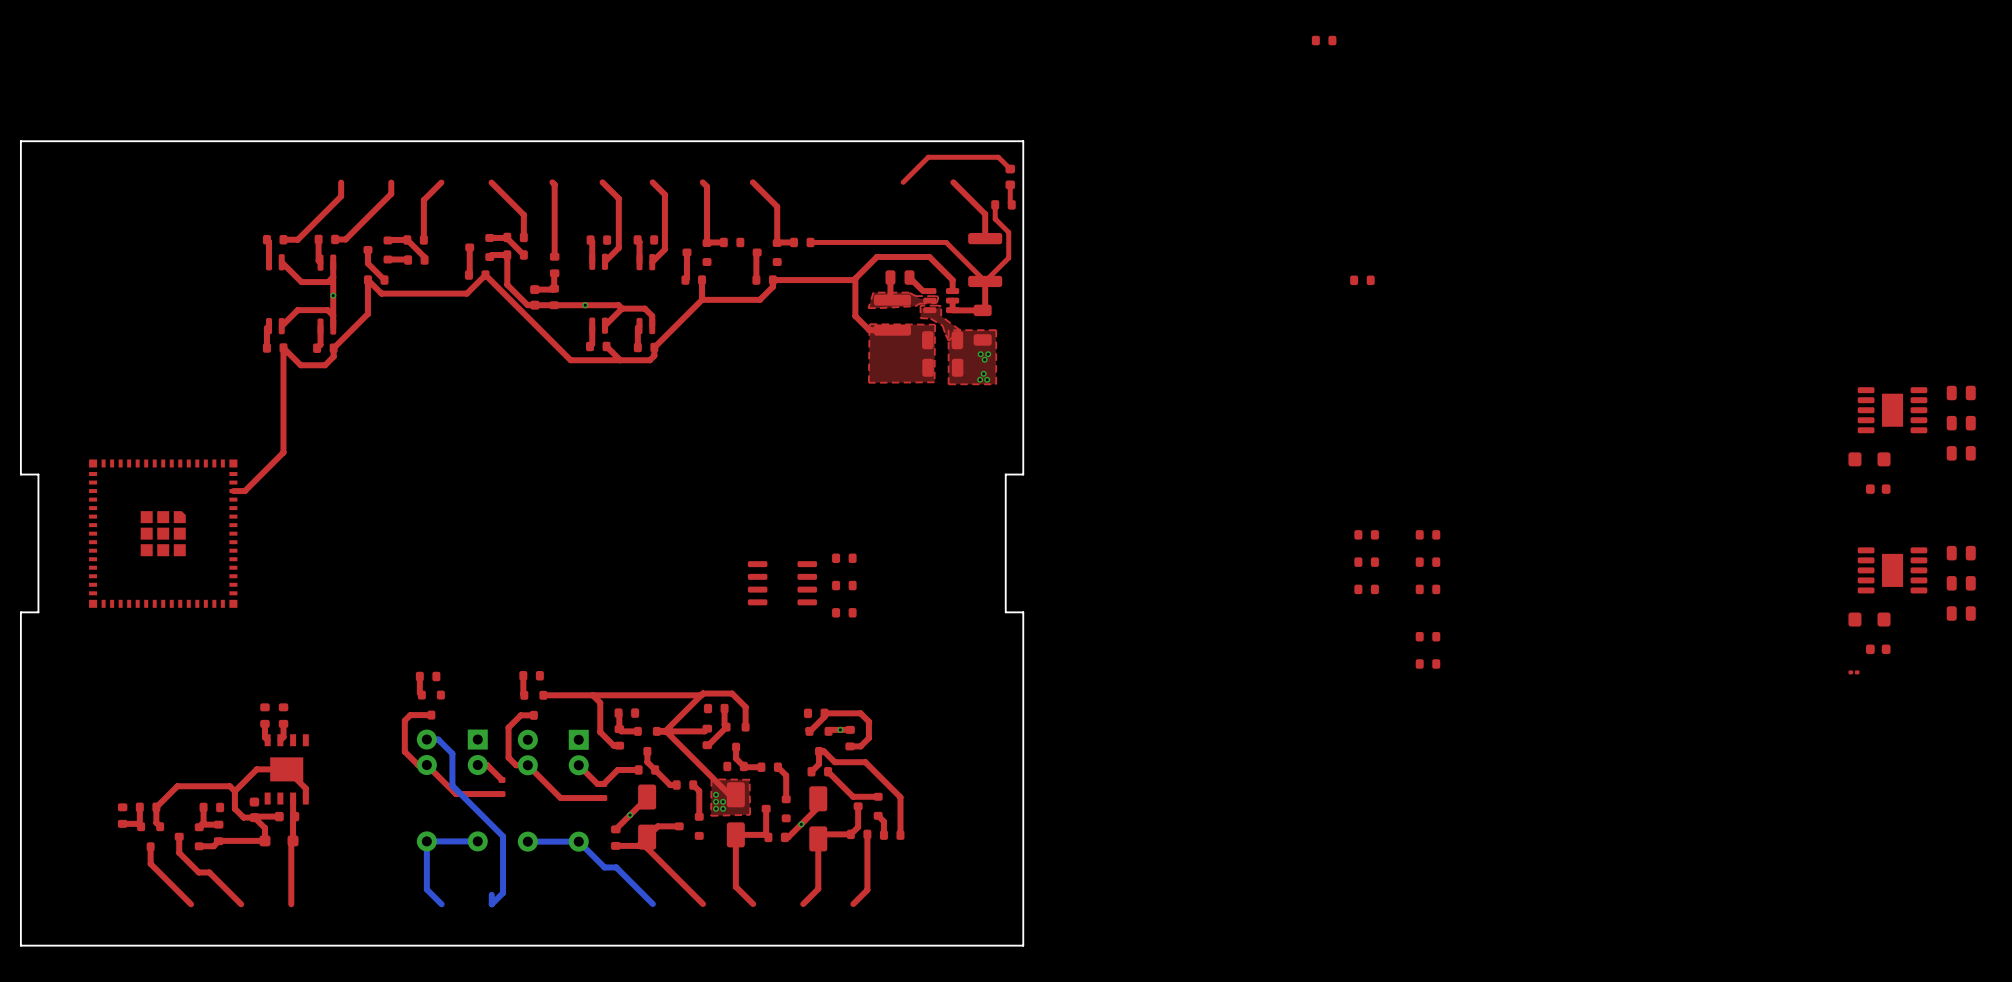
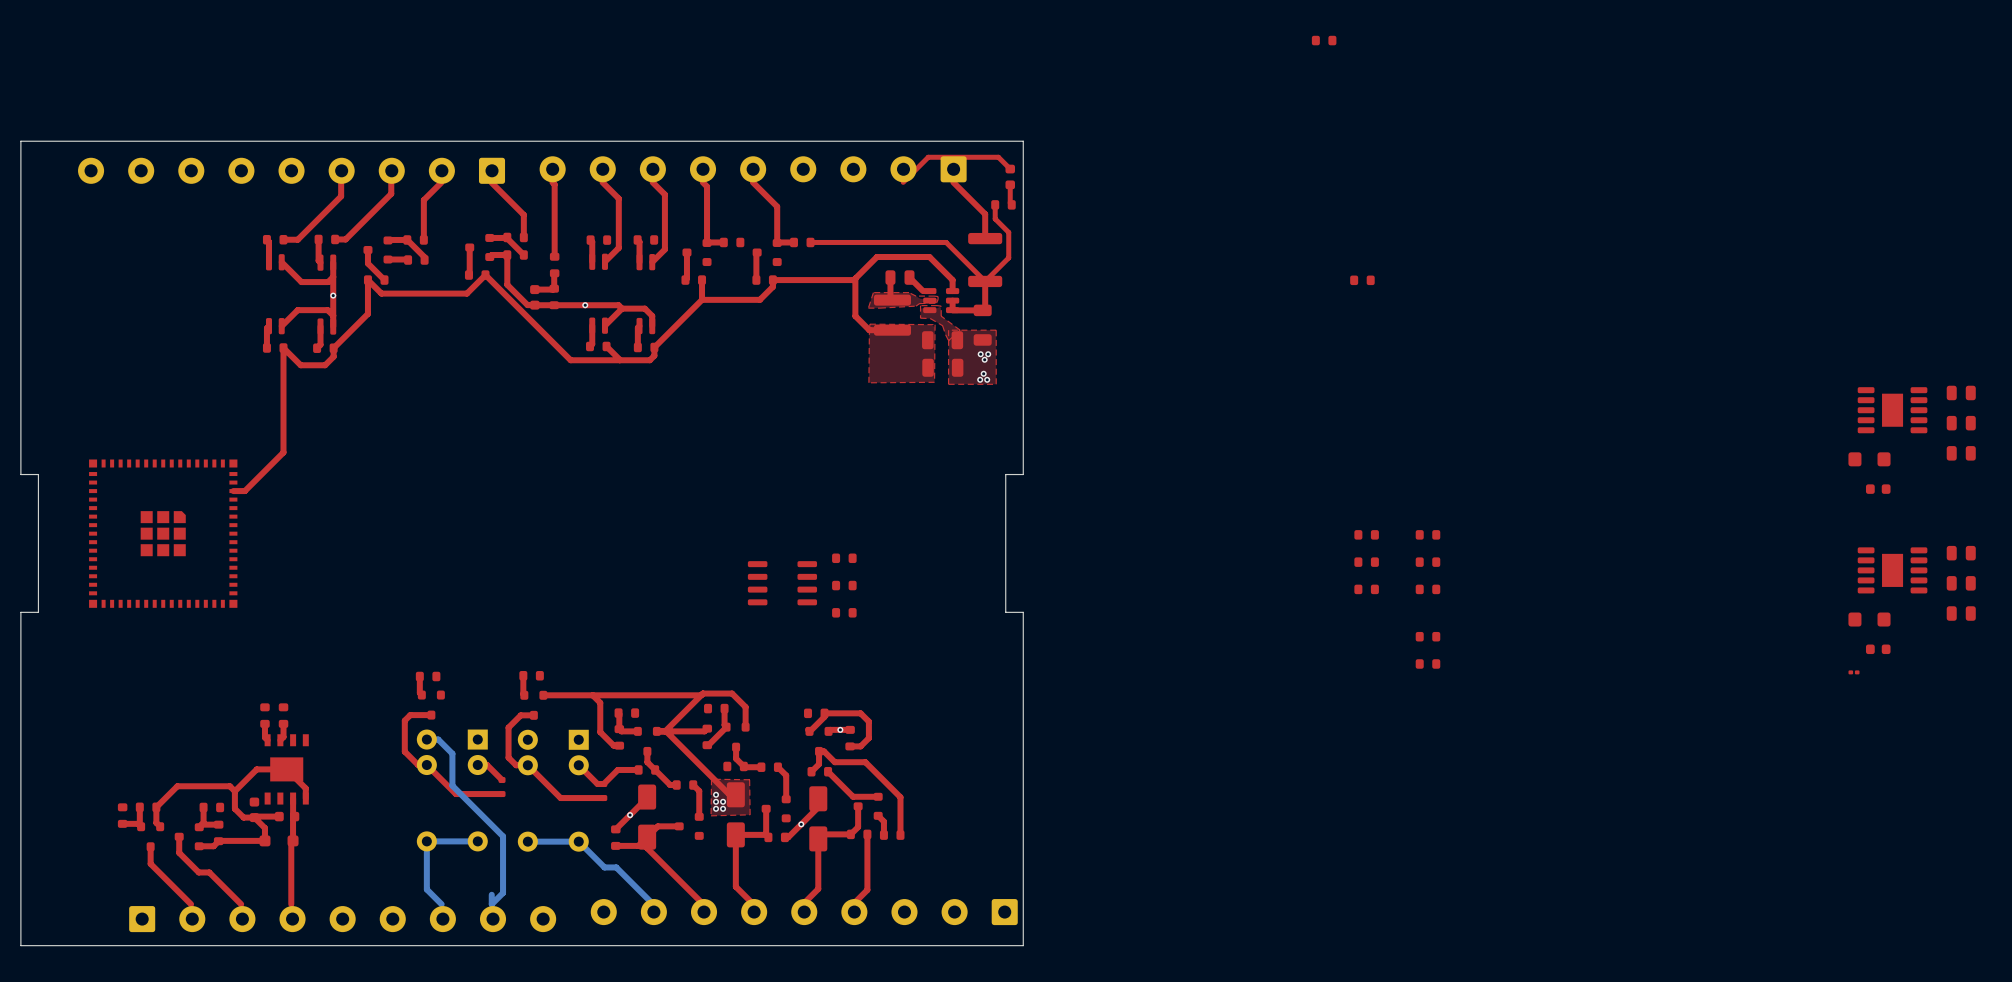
part: none -> (753, 169)
part: none -> (291, 170)
part: none -> (804, 912)
part: none -> (342, 919)

